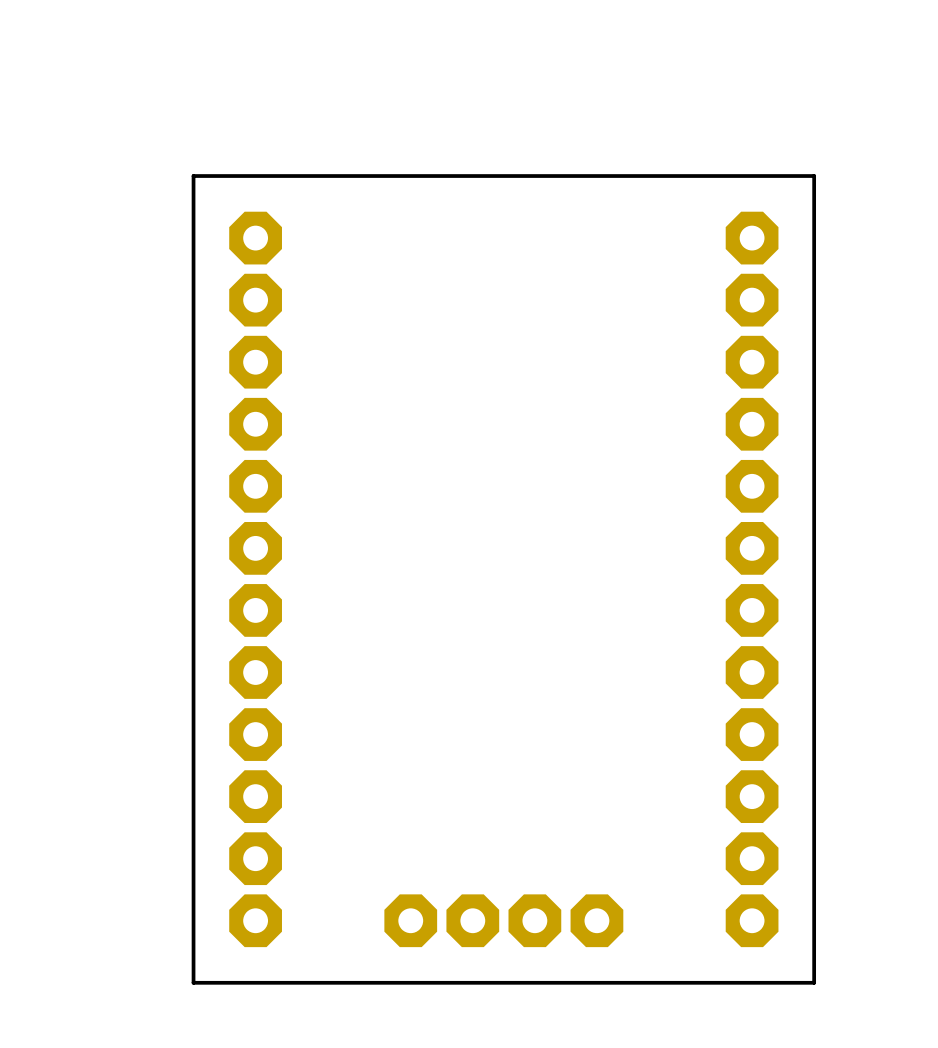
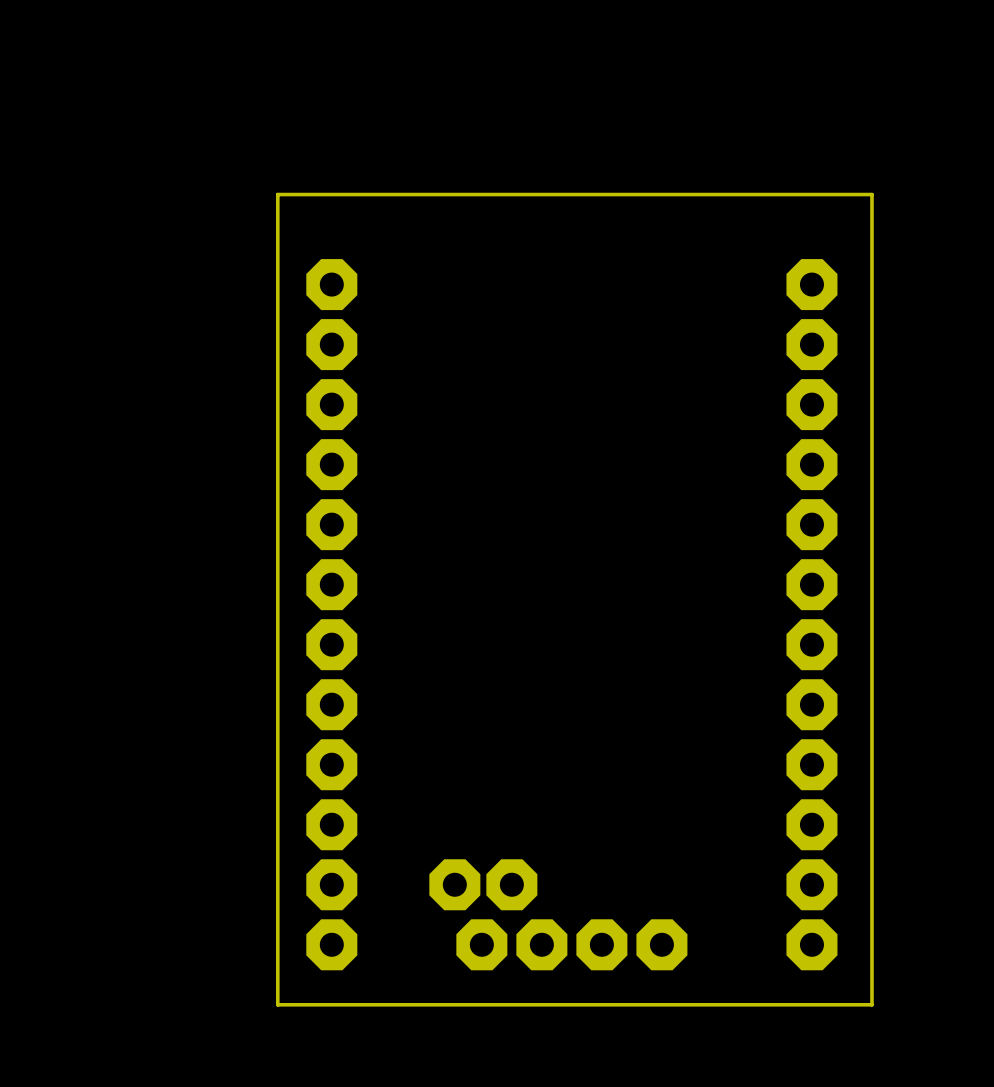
board edge: (814, 176) (193, 176) (193, 982) (199, 982) -> (871, 224) (871, 194) (277, 194) (277, 1004)
part: none -> (454, 884)
part: none -> (511, 884)

